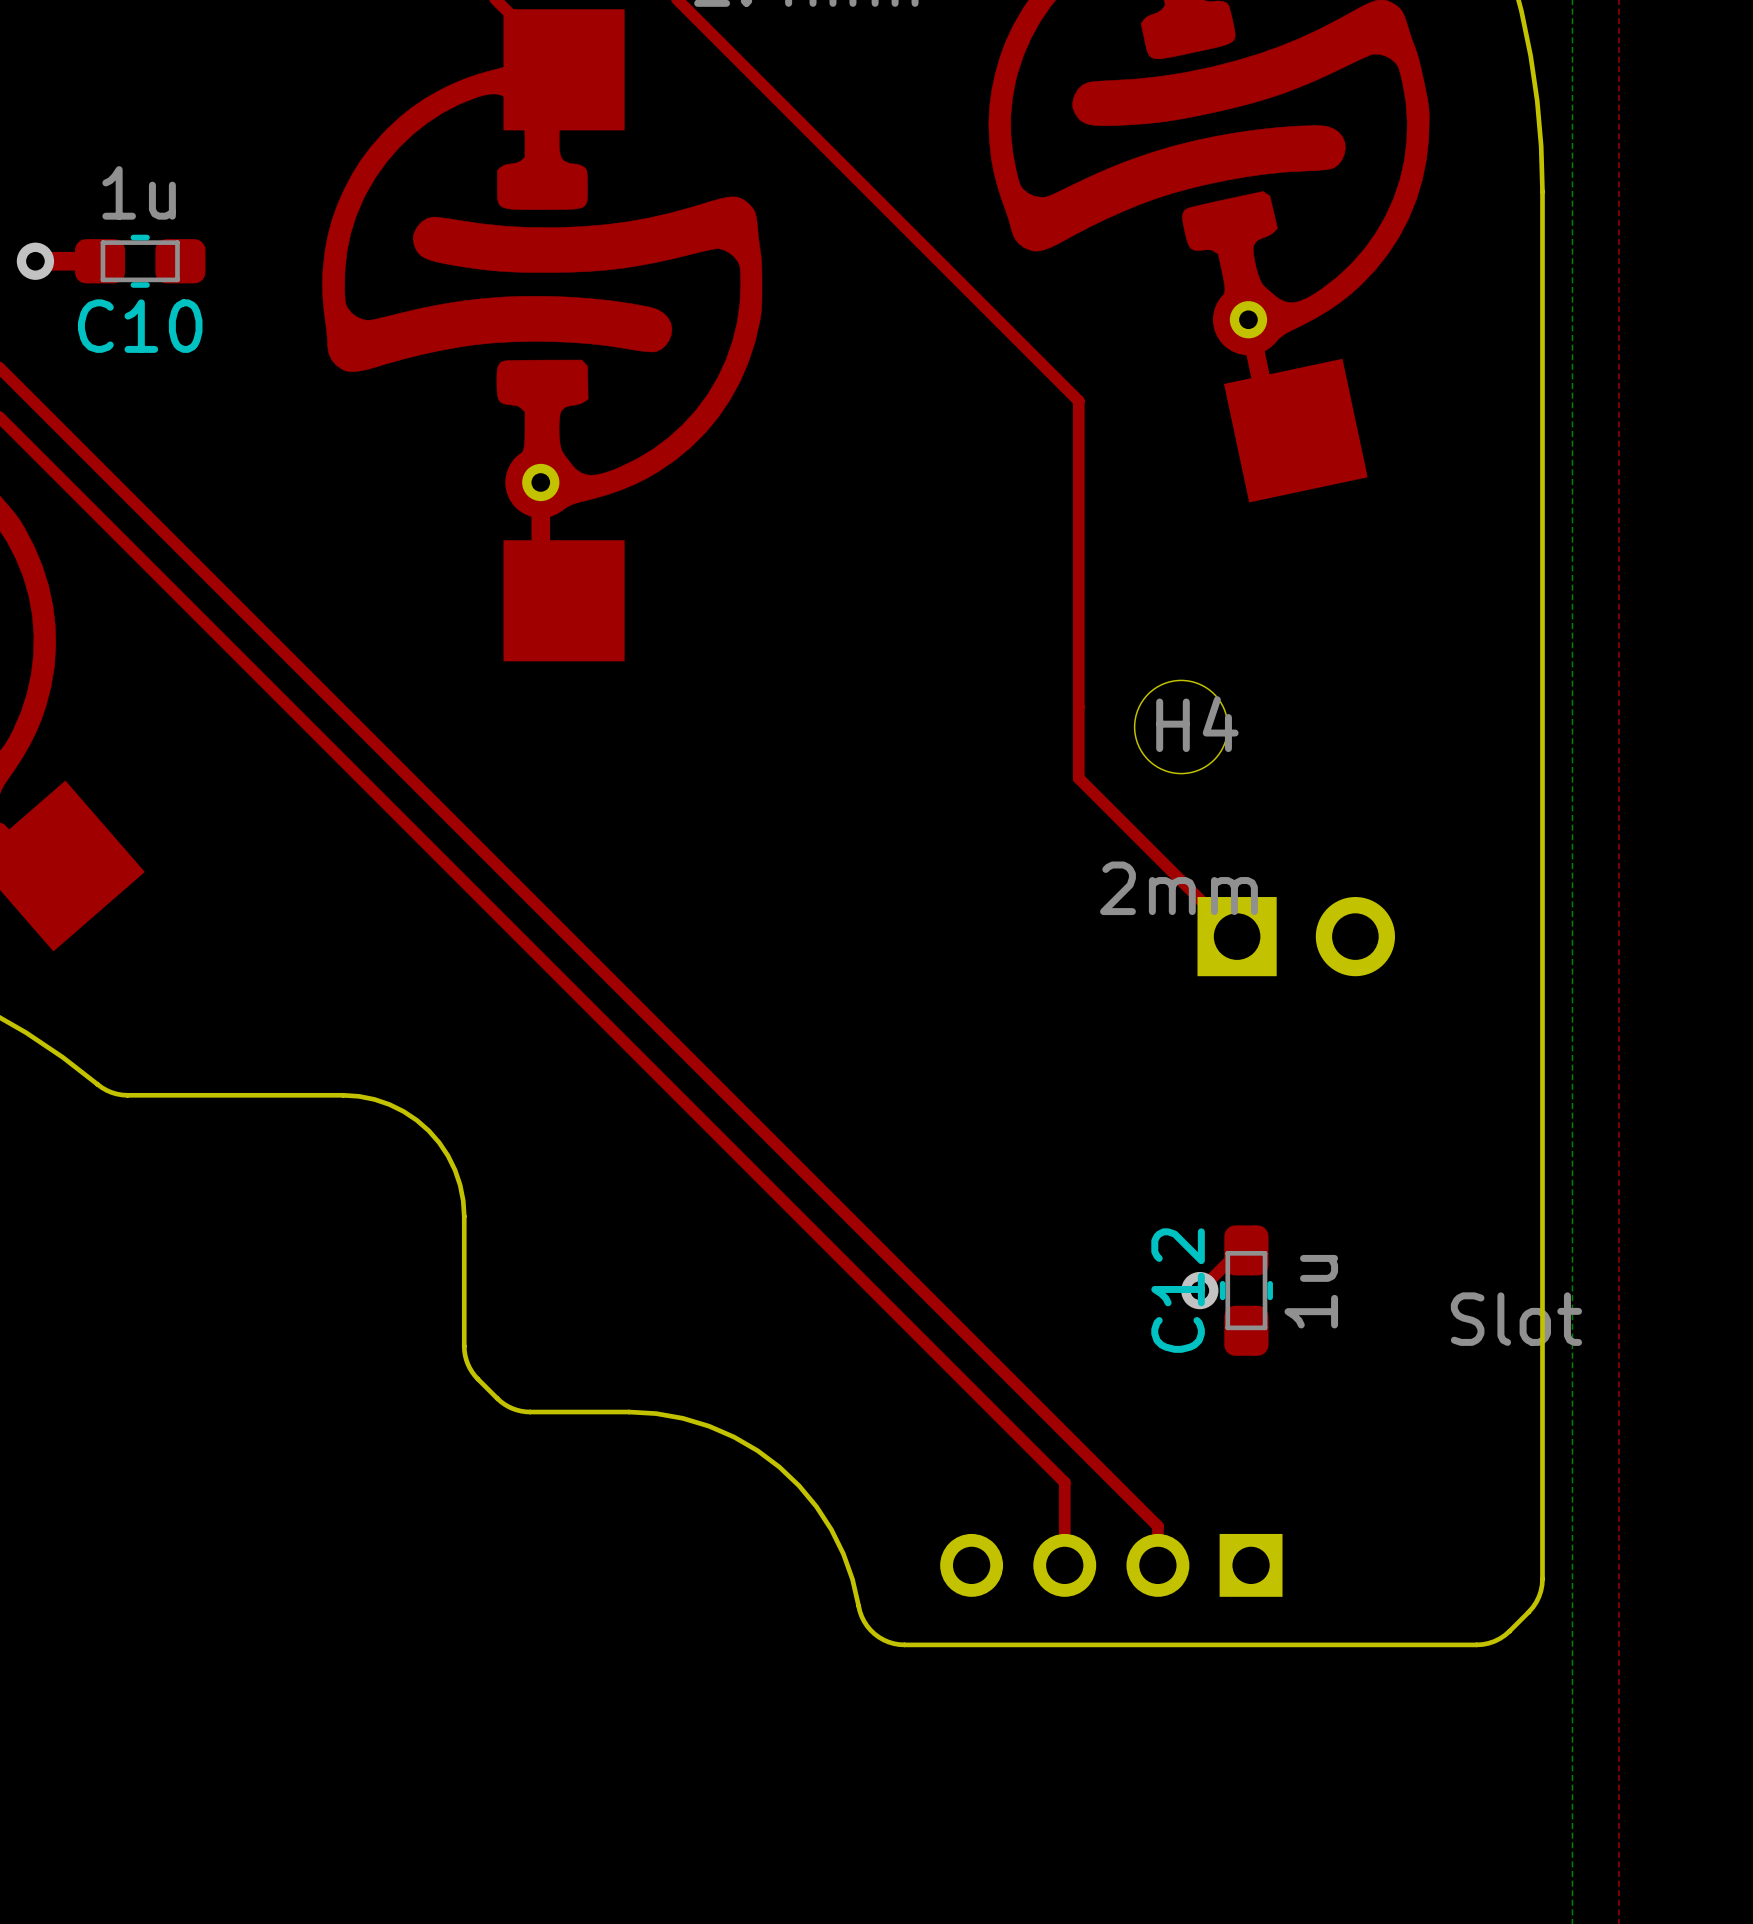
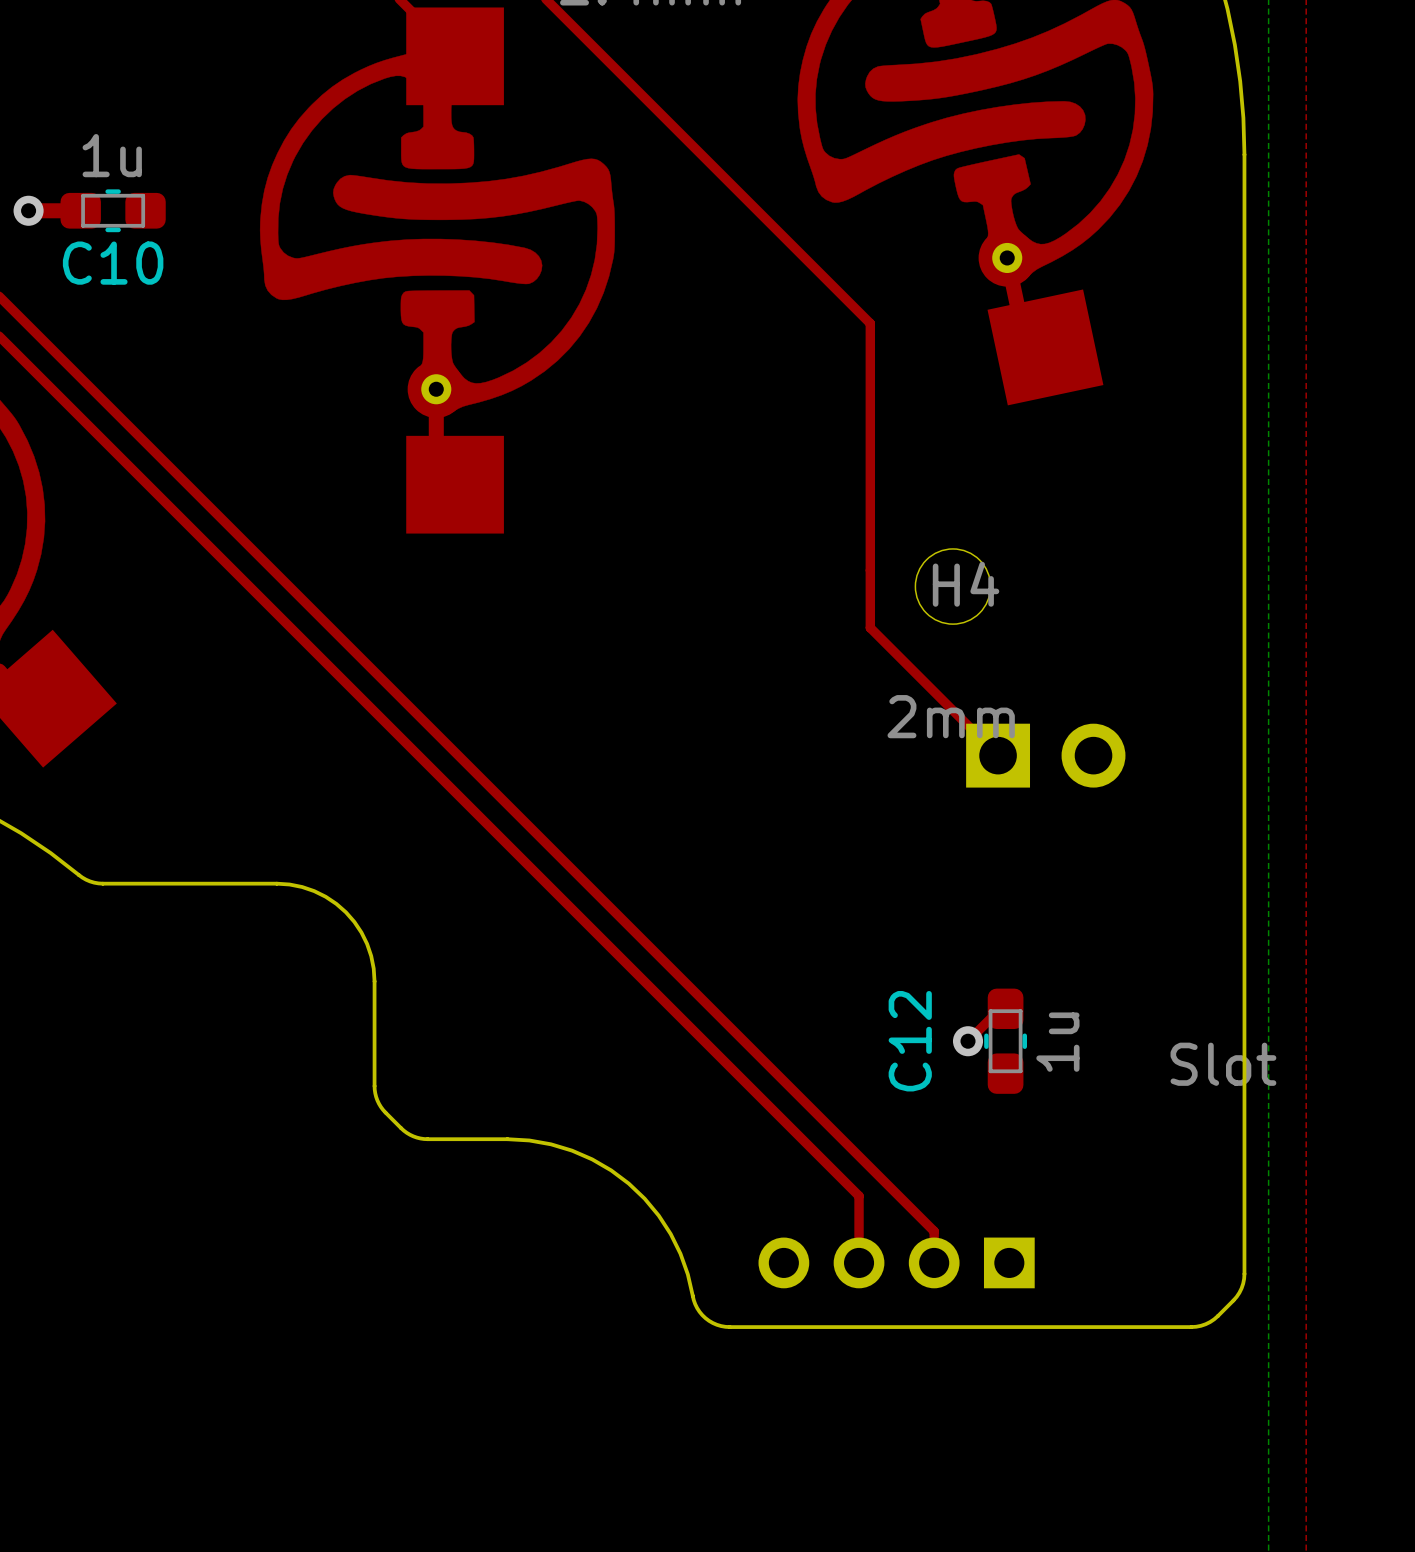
C12 name position: C12 (1178, 1290) -> C12 (910, 1041)

